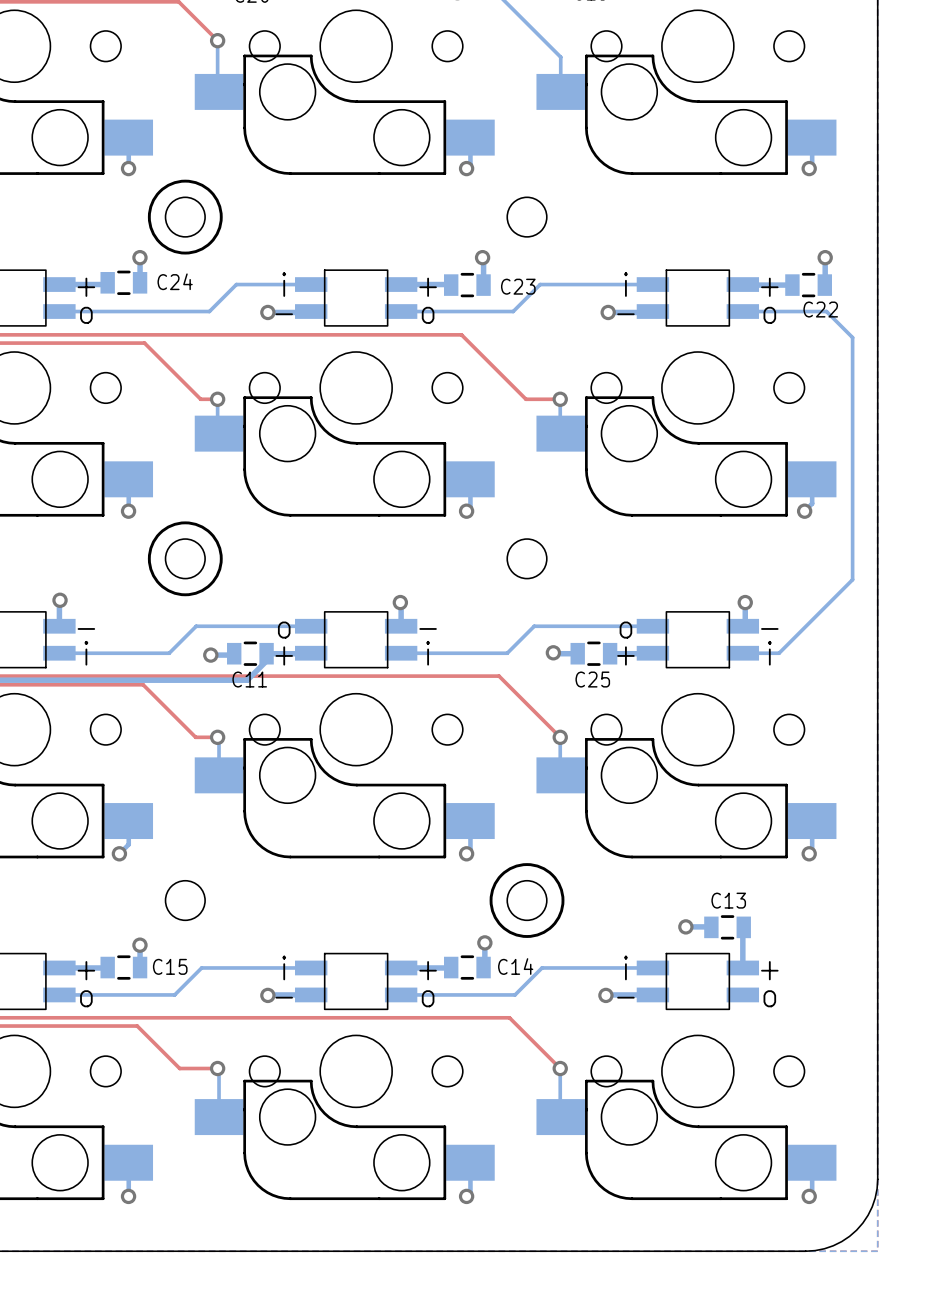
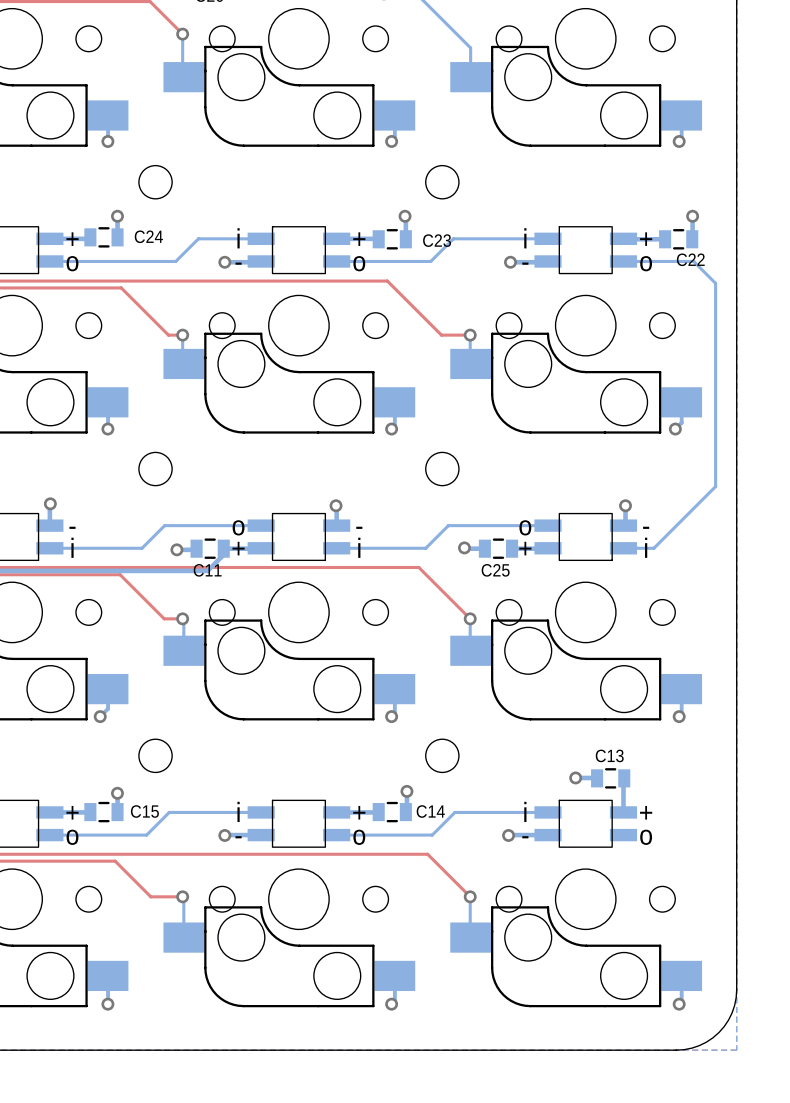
drawing: [147, 179, 223, 255] -> none
drawing: [147, 521, 223, 597] -> none
drawing: [489, 863, 565, 938] -> none

